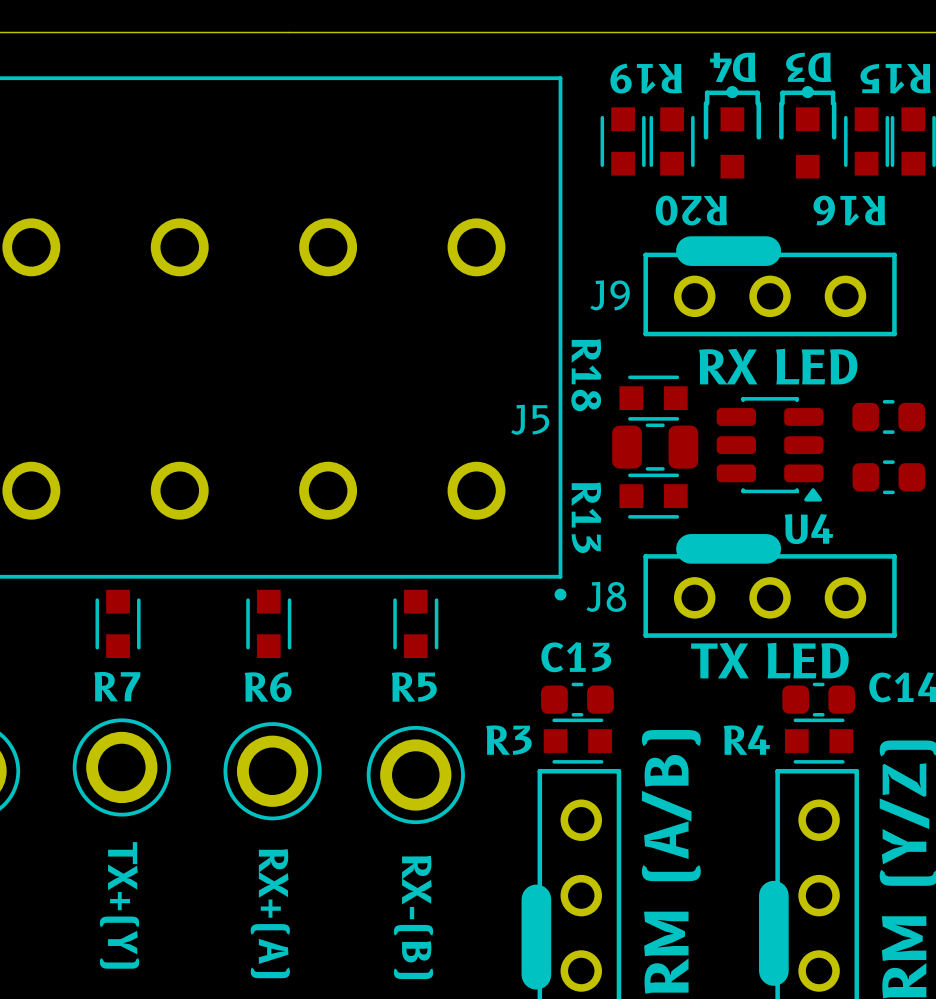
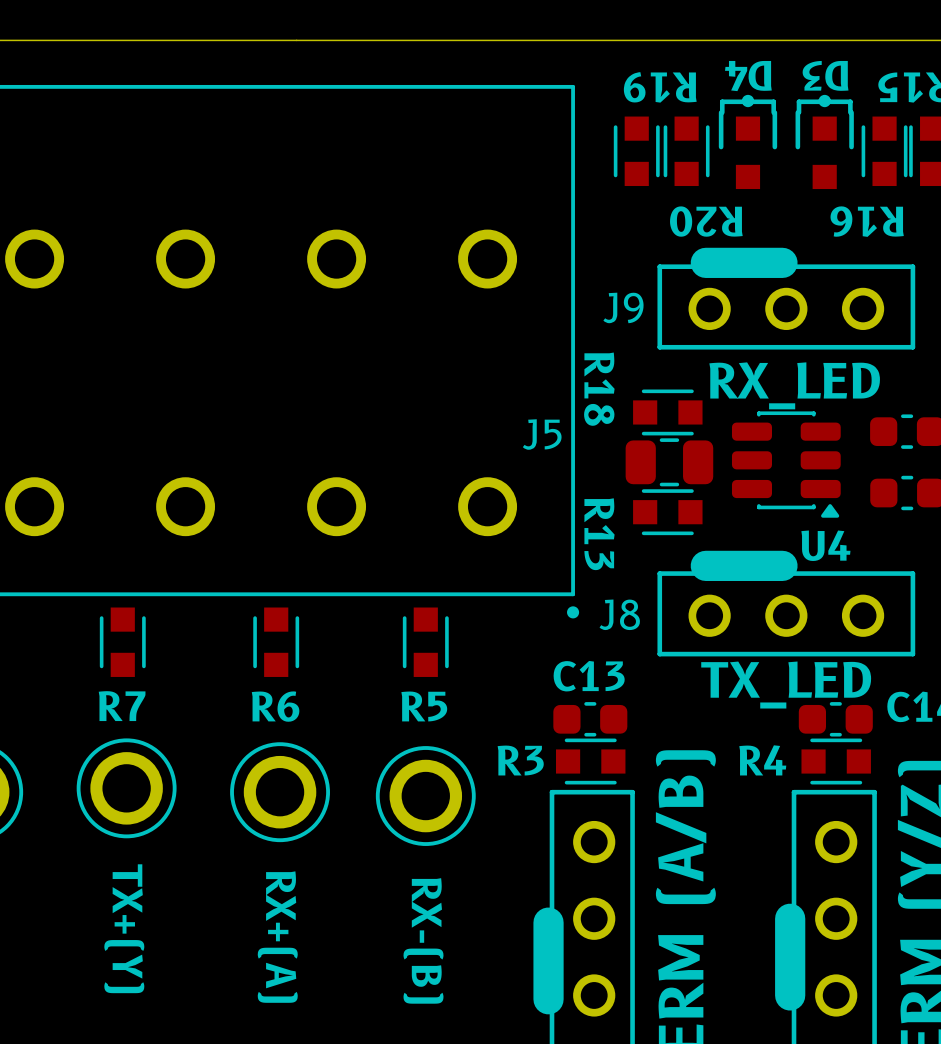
J9 value: RX LED (778, 366) -> RX_LED (794, 385)
J8 value: TX LED (769, 660) -> TX_LED (786, 685)

